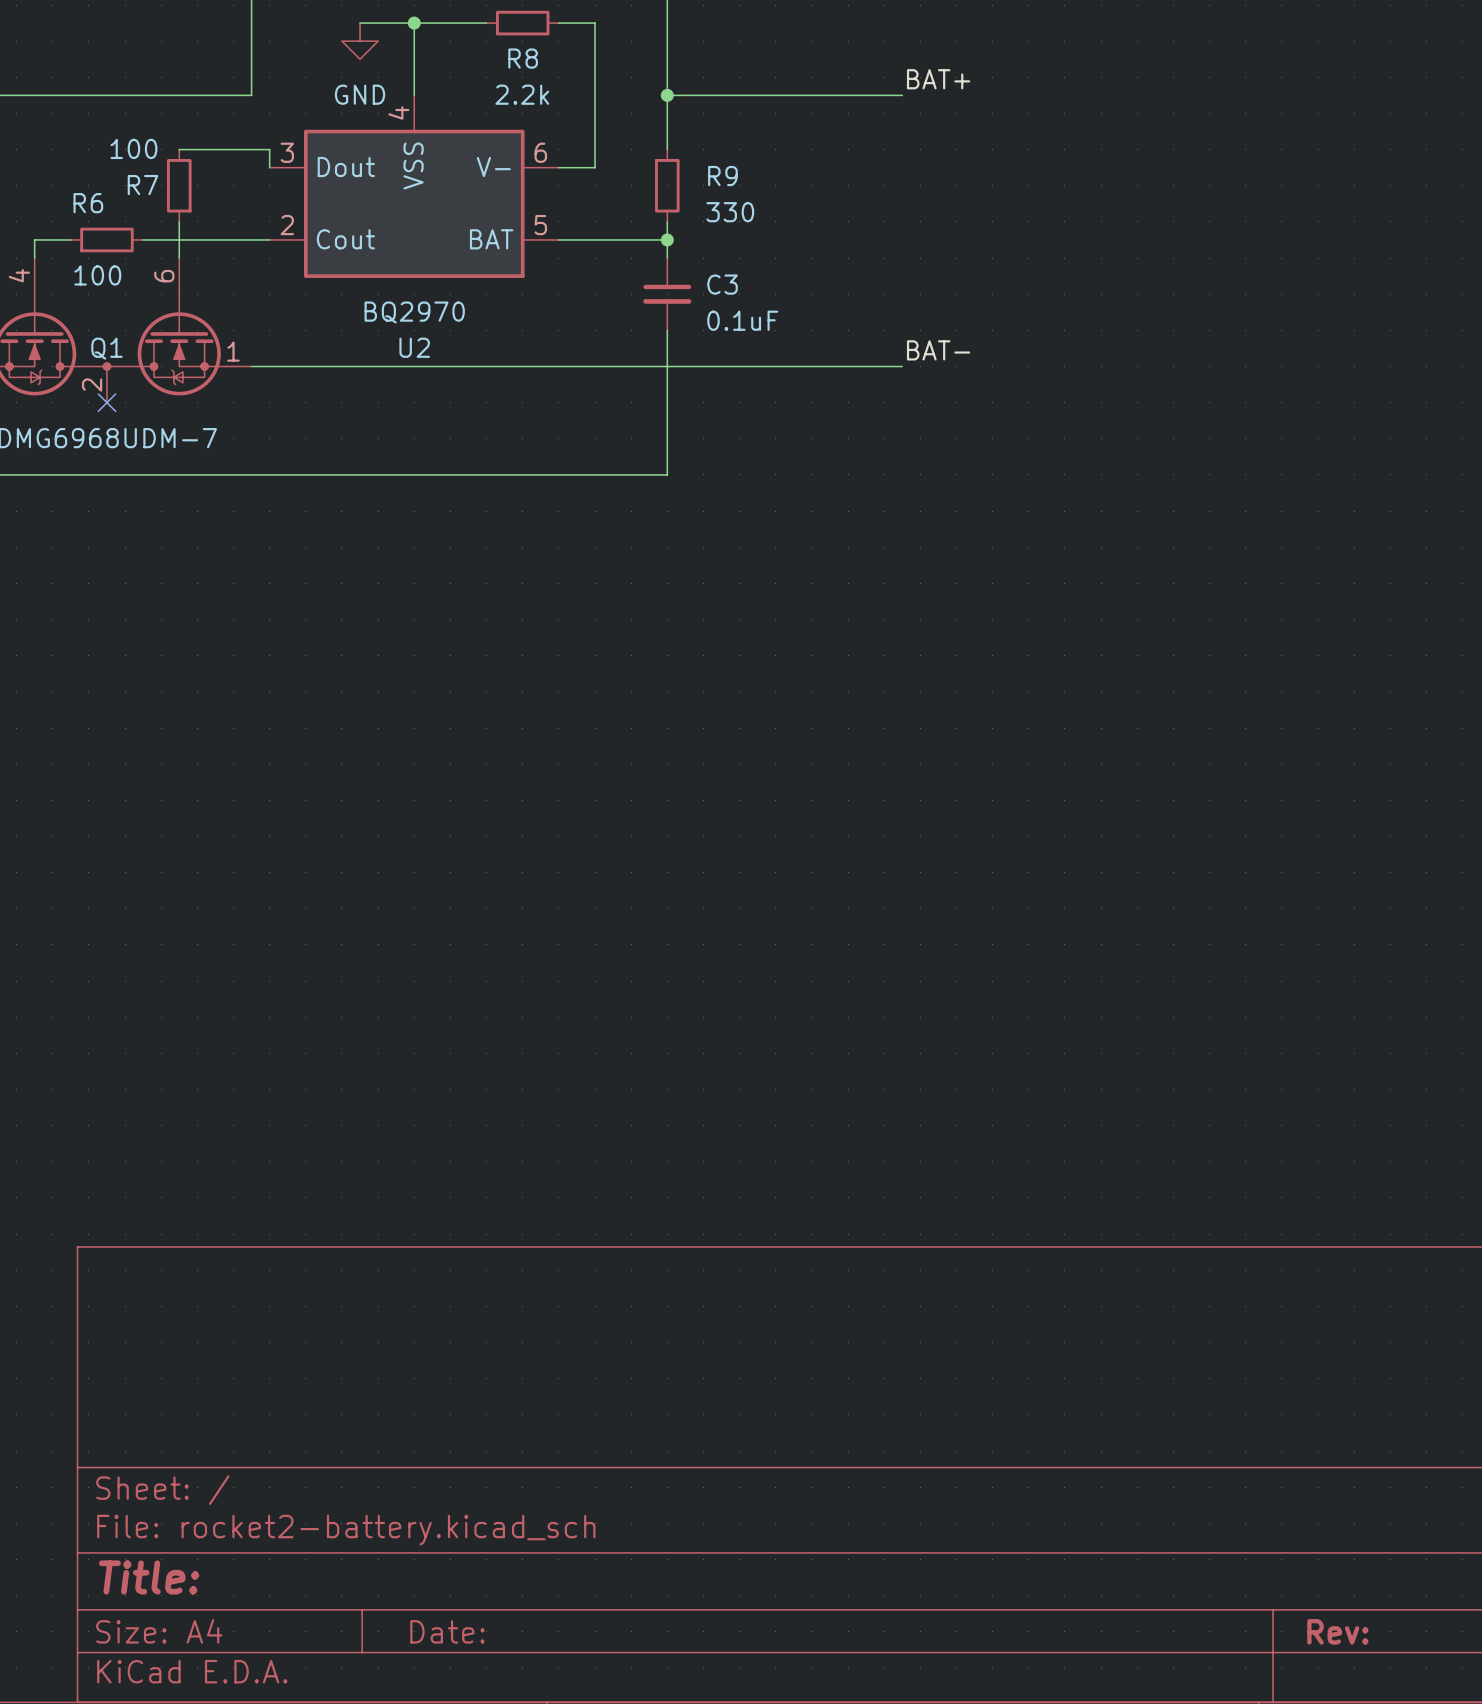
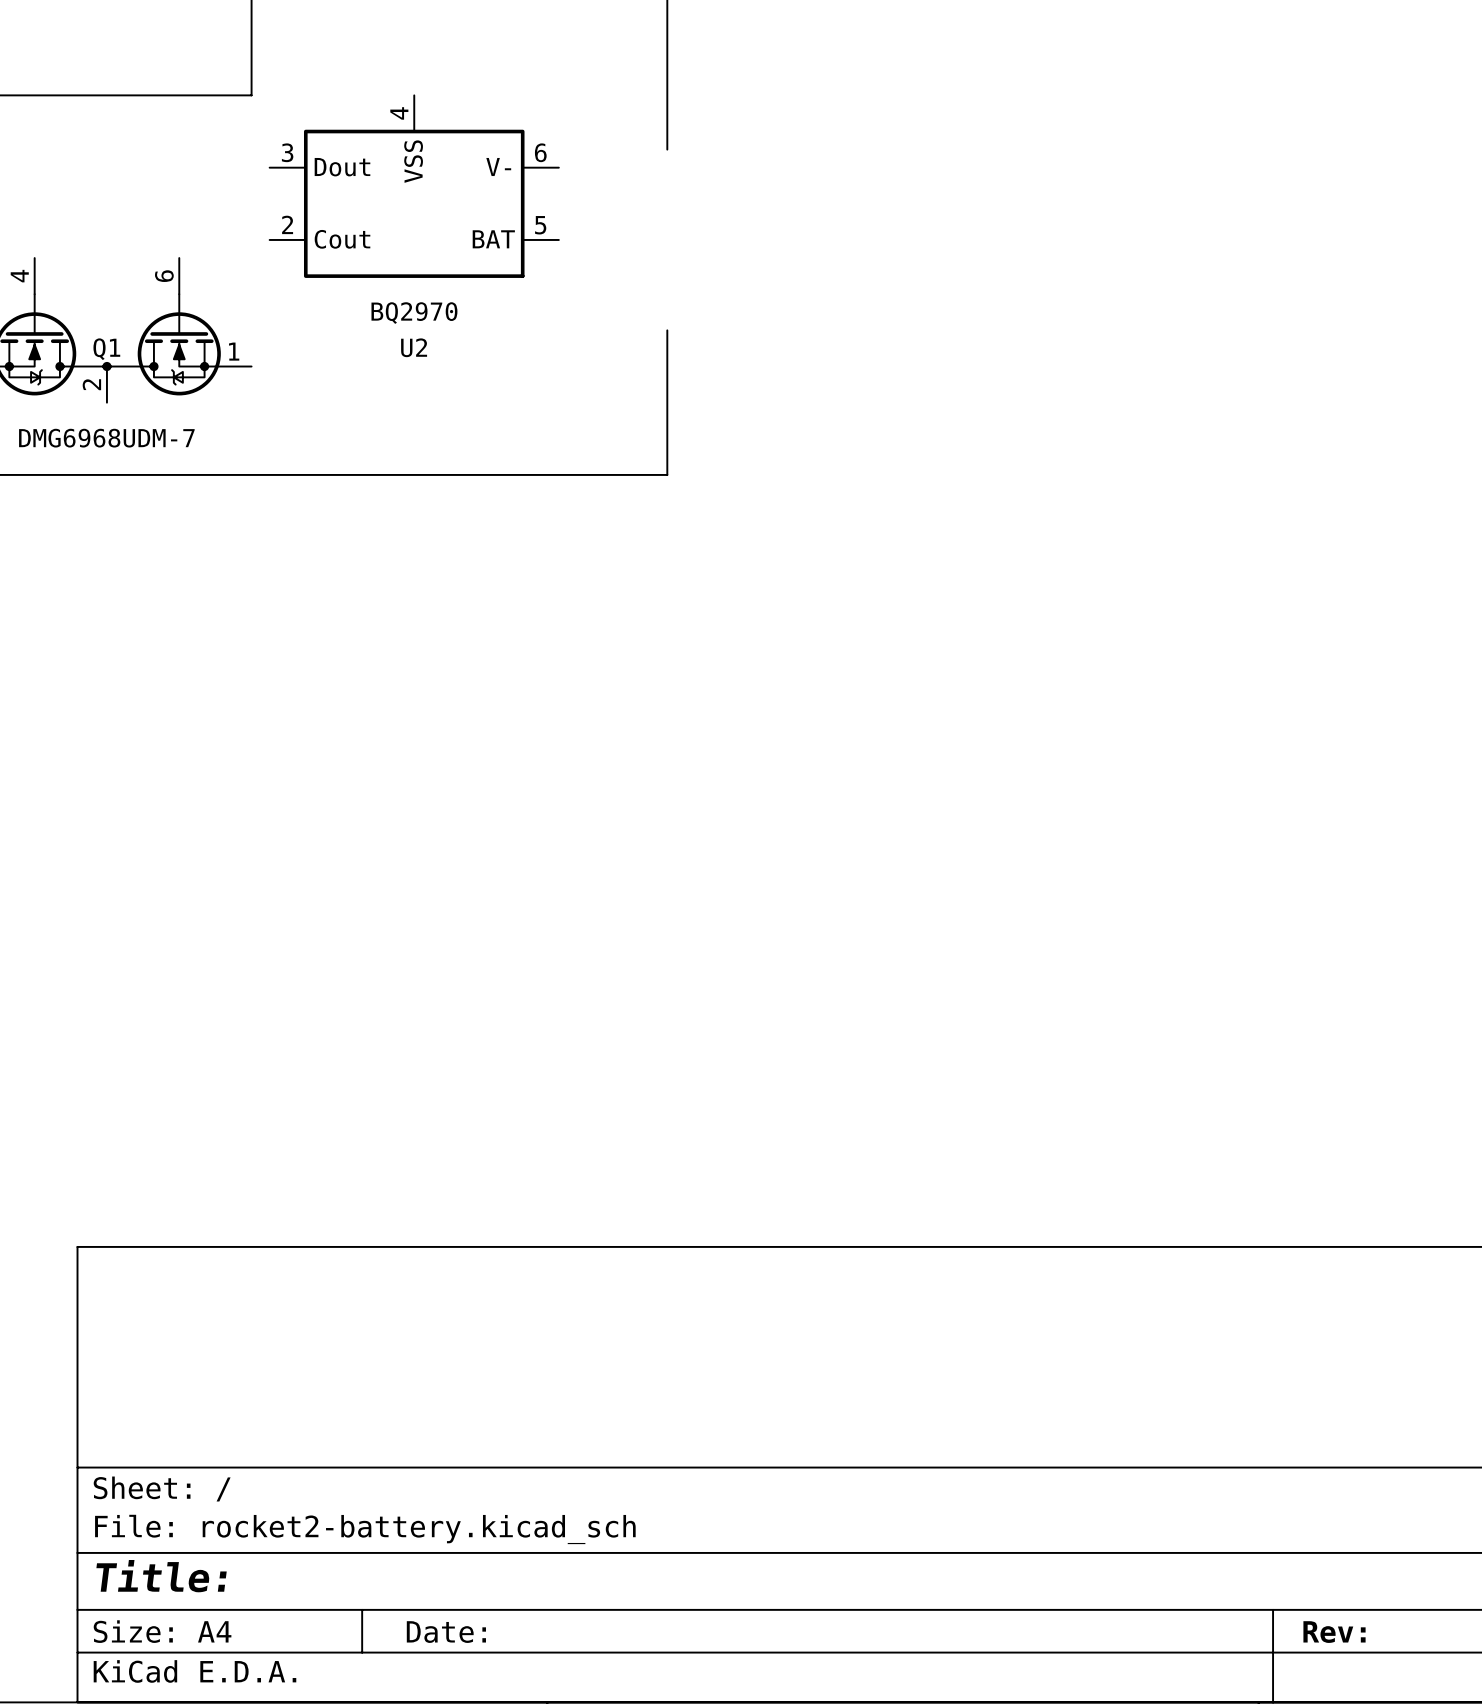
wire: (360, 23) (486, 23) -> none
wire: (414, 23) (414, 95) -> none
junction: (414, 23) -> none
R8: 2.2k (522, 23) -> none
wire: (558, 23) (595, 23) (595, 167) (558, 167) -> none
power symbol: GND (360, 41) -> none
label: BAT+ (938, 79) -> none
wire: (667, 95) (902, 95) -> none
junction: (667, 95) -> none
wire: (179, 149) (269, 149) (269, 167) -> none
R7: 100 (179, 185) -> none
R9: 330 (667, 185) -> none
wire: (179, 221) (179, 258) -> none
wire: (667, 221) (667, 258) -> none
wire: (70, 239) (34, 239) (34, 258) -> none
R6: 100 (106, 239) -> none
wire: (143, 239) (269, 239) -> none
wire: (558, 239) (667, 239) -> none
junction: (667, 239) -> none
C3: 0.1uF (667, 294) -> none
label: BAT- (938, 350) -> none
wire: (251, 366) (902, 366) -> none
no-connect mark: (106, 402) -> none

